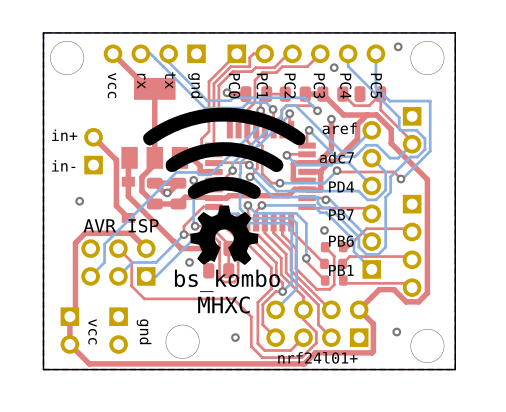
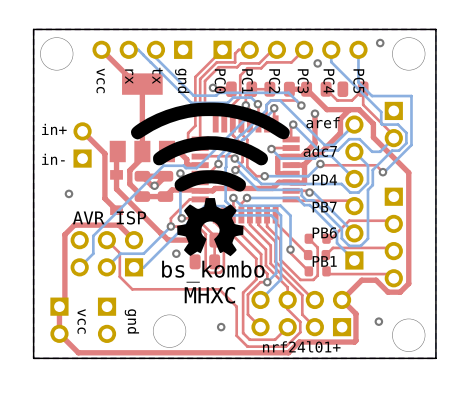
via: (324, 230) -> none

